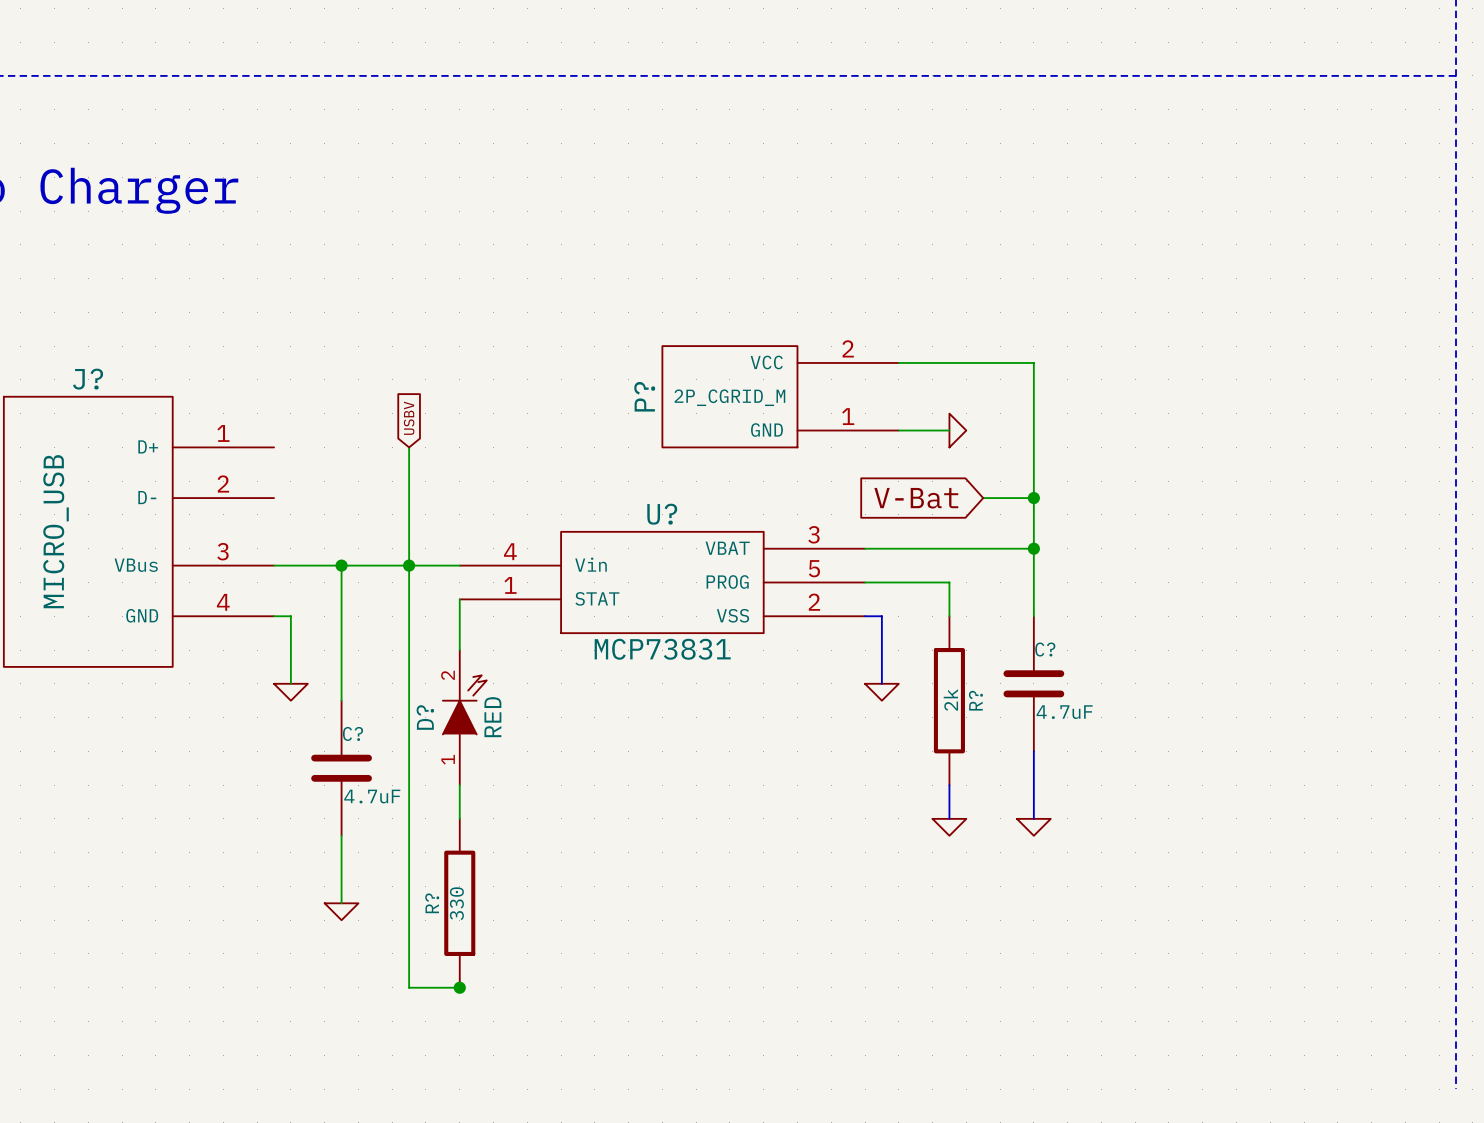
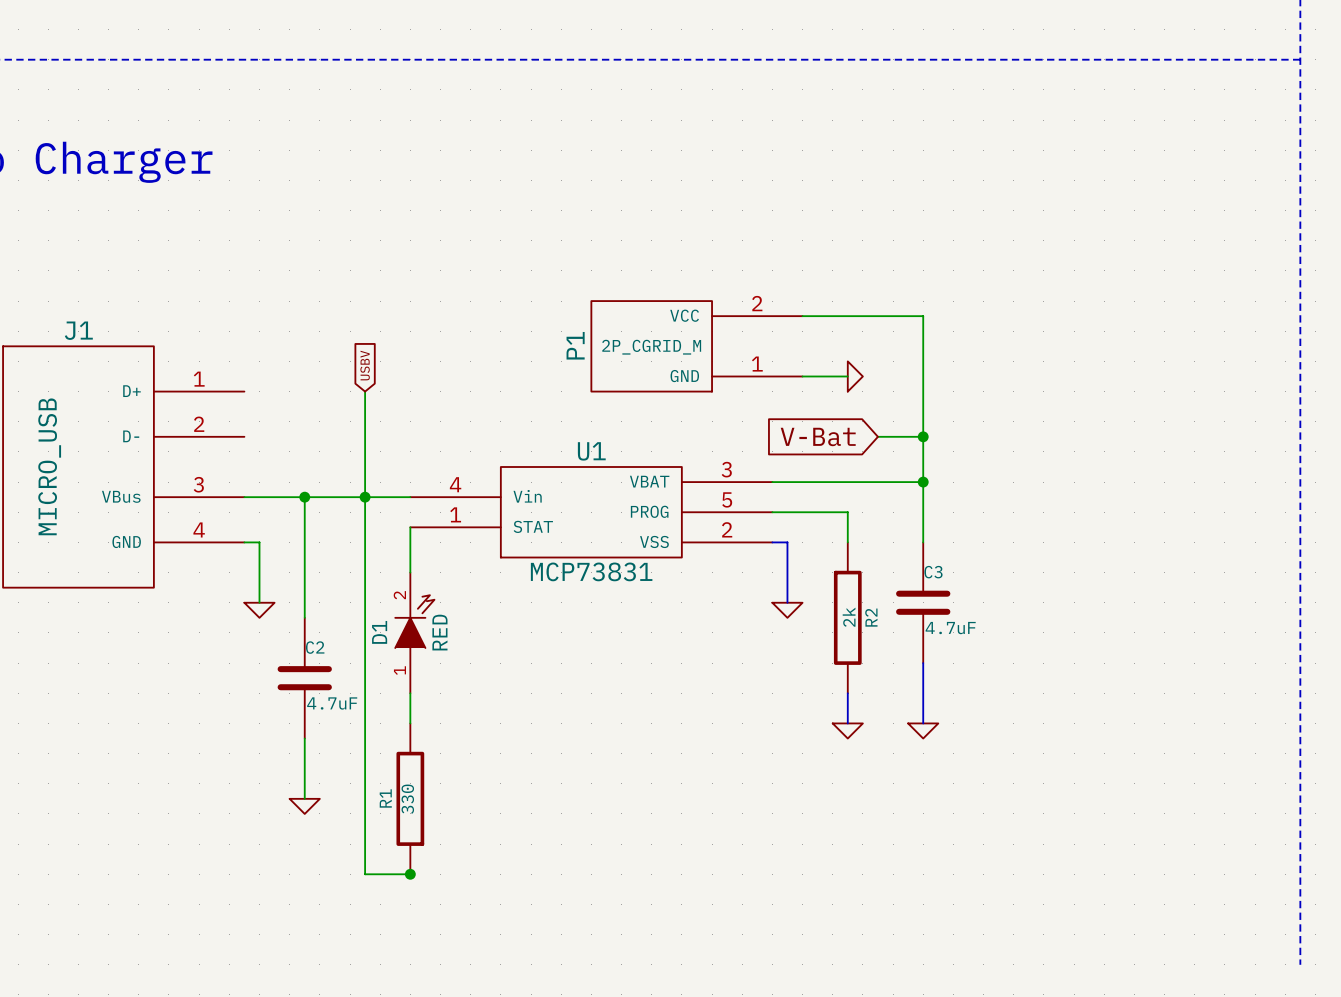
J? name: J? (88, 379) -> J1 (78, 330)
P? name: P? (644, 396) -> P1 (575, 345)
U? name: U? (662, 514) -> U1 (591, 451)
C? name: C? (1045, 649) -> C3 (933, 572)
R? name: R? (975, 700) -> R2 (871, 617)
D? name: D? (425, 717) -> D1 (379, 632)
C? name: C? (352, 733) -> C2 (315, 647)
R? name: R? (432, 903) -> R1 (385, 798)

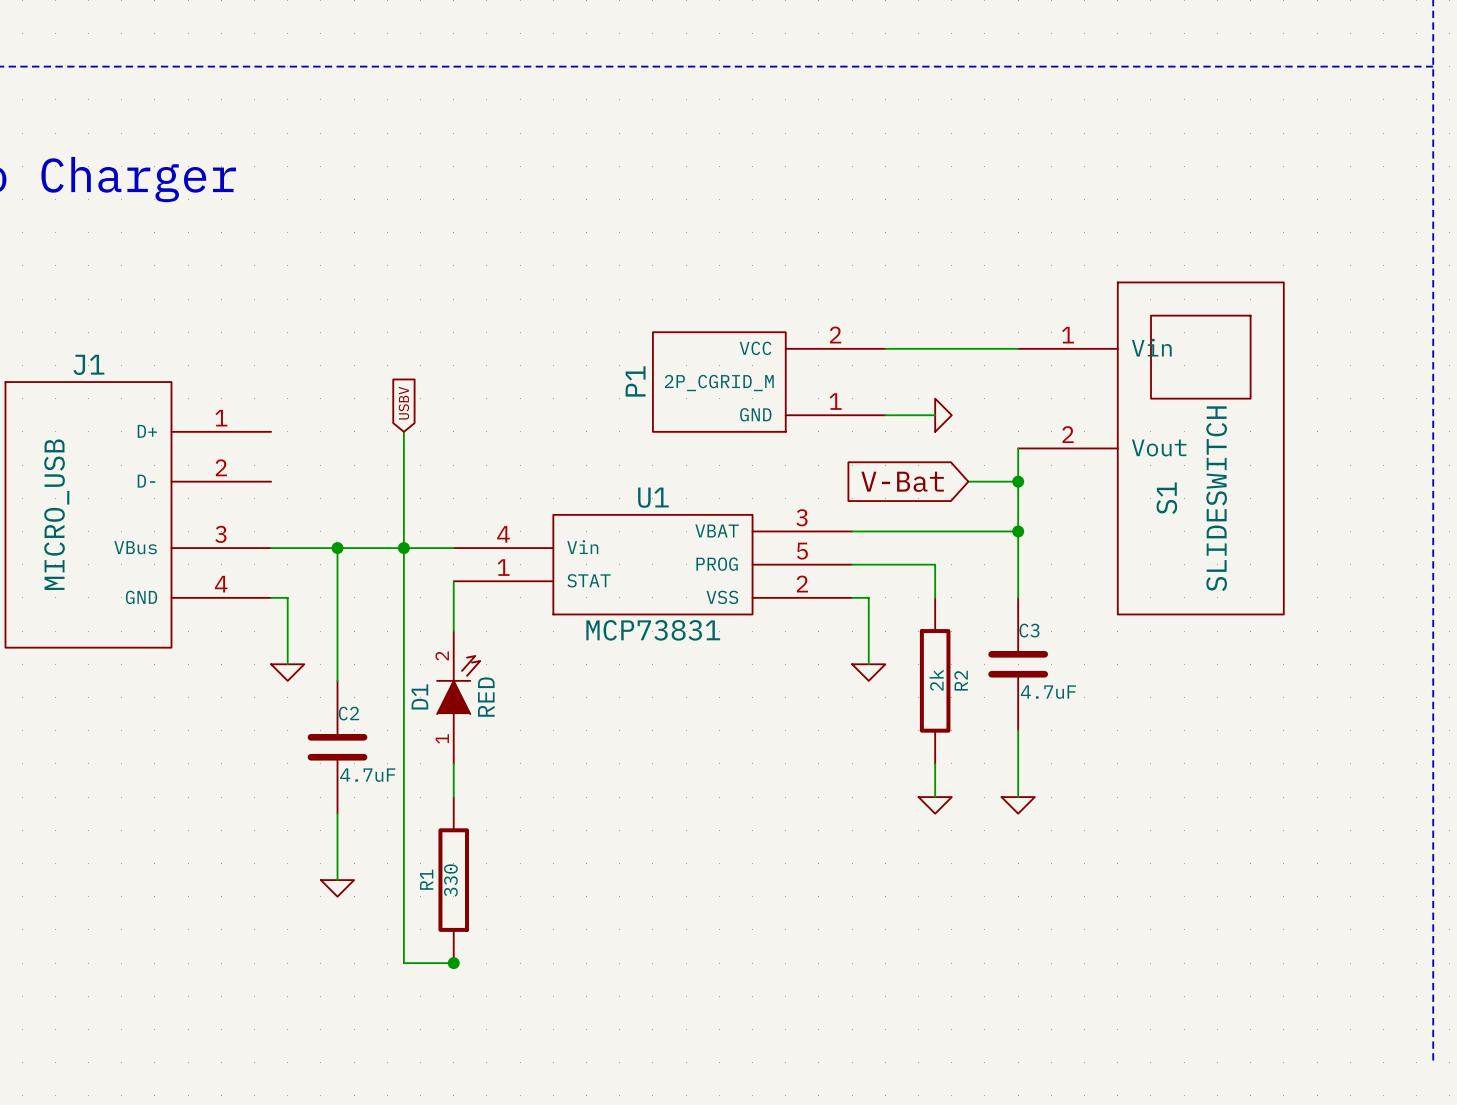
wire: (923, 316) (923, 406) -> none
S1: none -> SLIDESWITCH (1150, 448)
bus: (772, 542) (787, 542) (787, 602) -> none
bus: (923, 663) (923, 723) -> none
bus: (847, 693) (847, 723) -> none

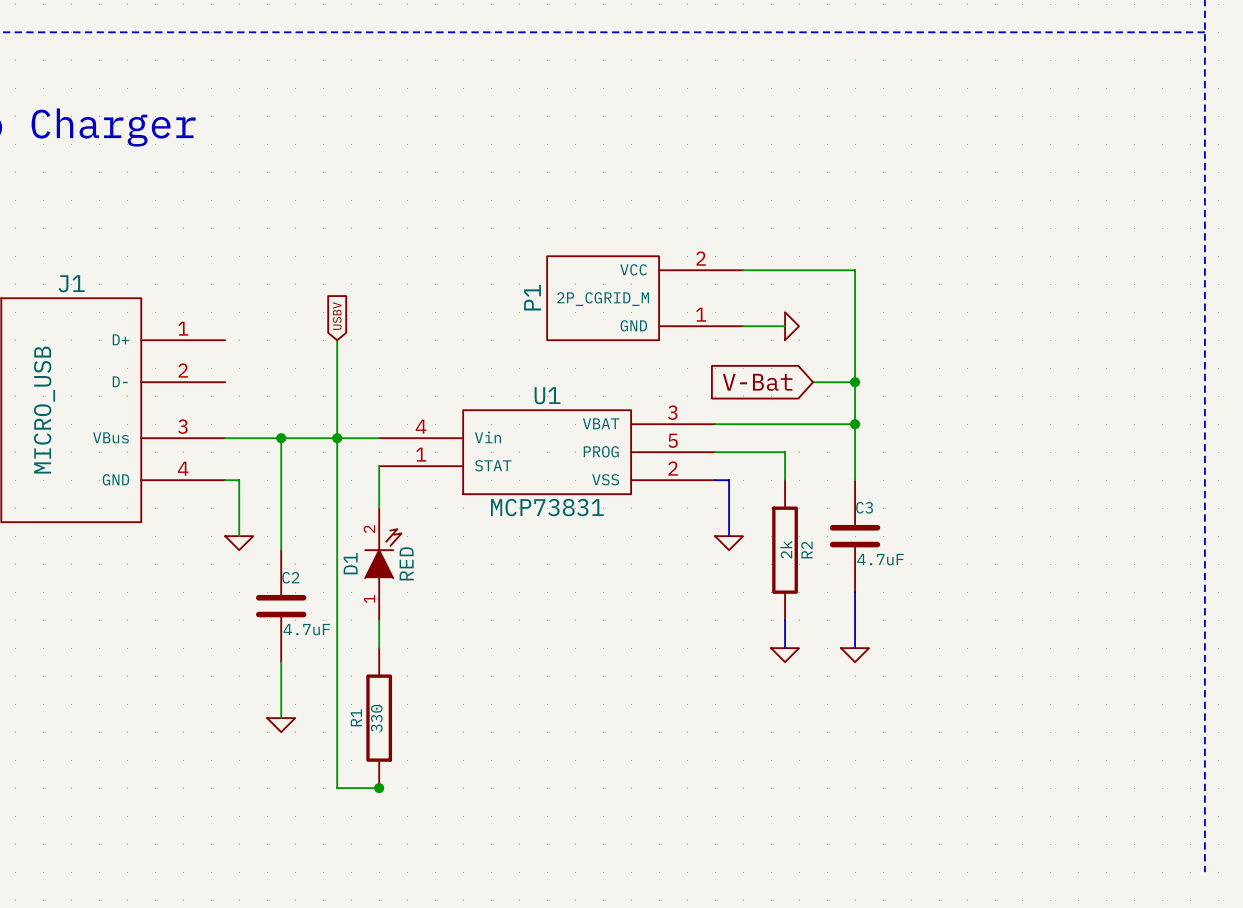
wire: none -> (855, 270) (855, 354)
S1: SLIDESWITCH (1150, 448) -> none
bus: none -> (715, 480) (729, 480) (729, 536)
bus: none -> (855, 592) (855, 648)
bus: none -> (785, 620) (785, 648)

